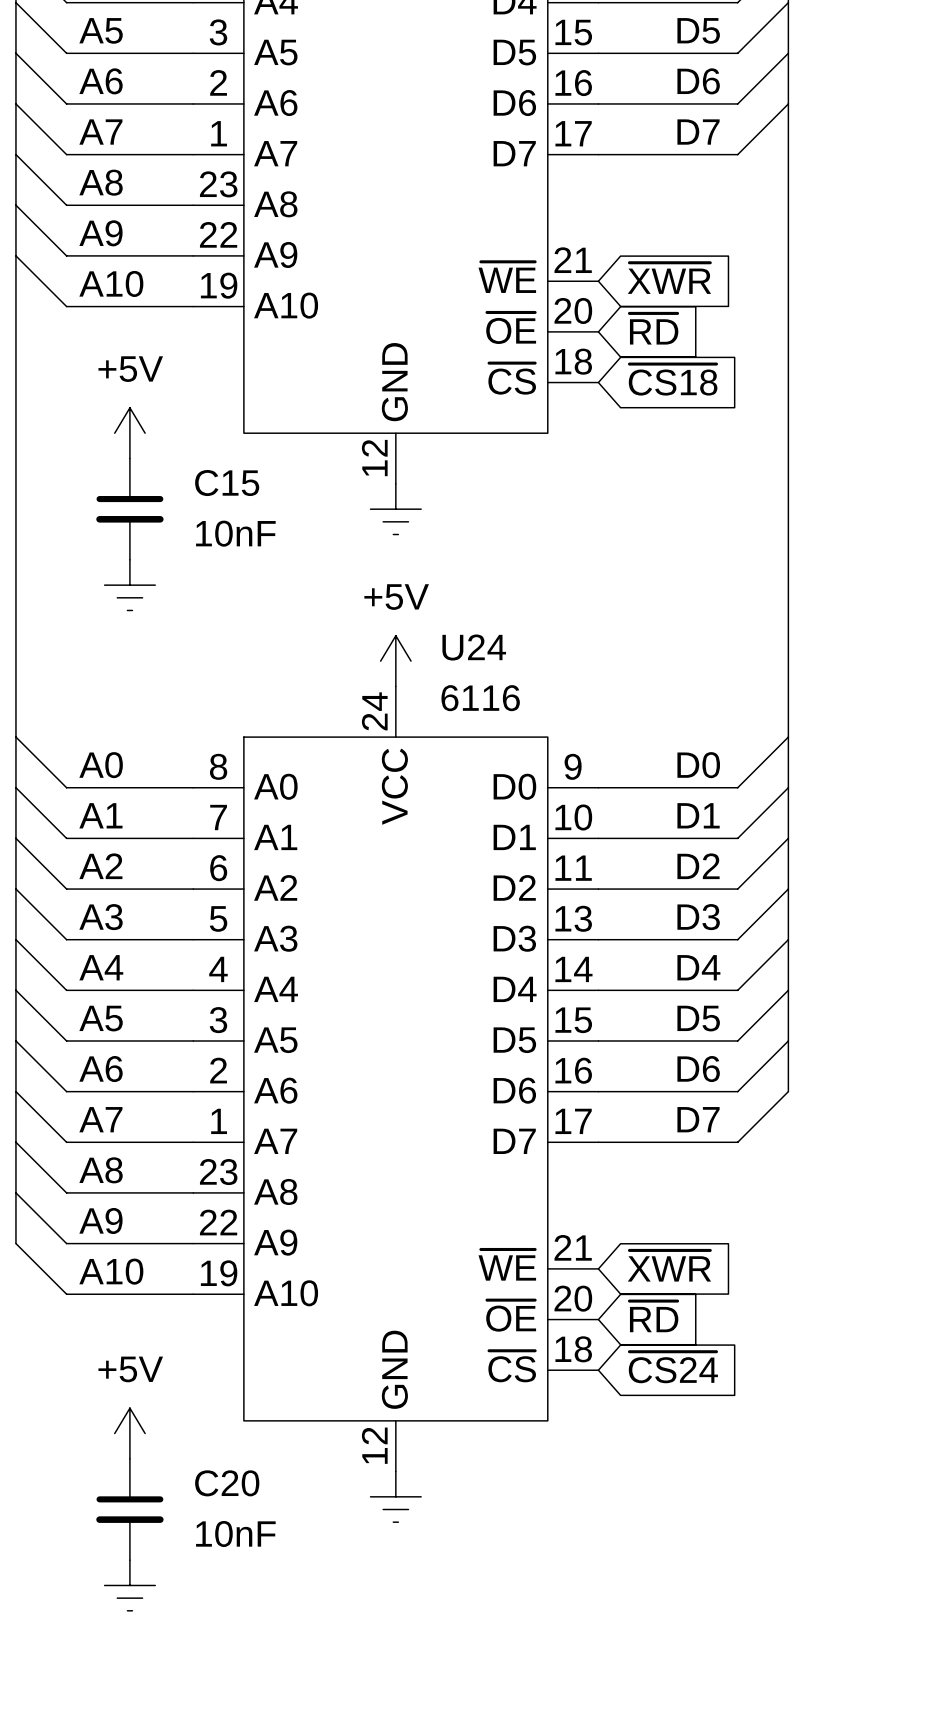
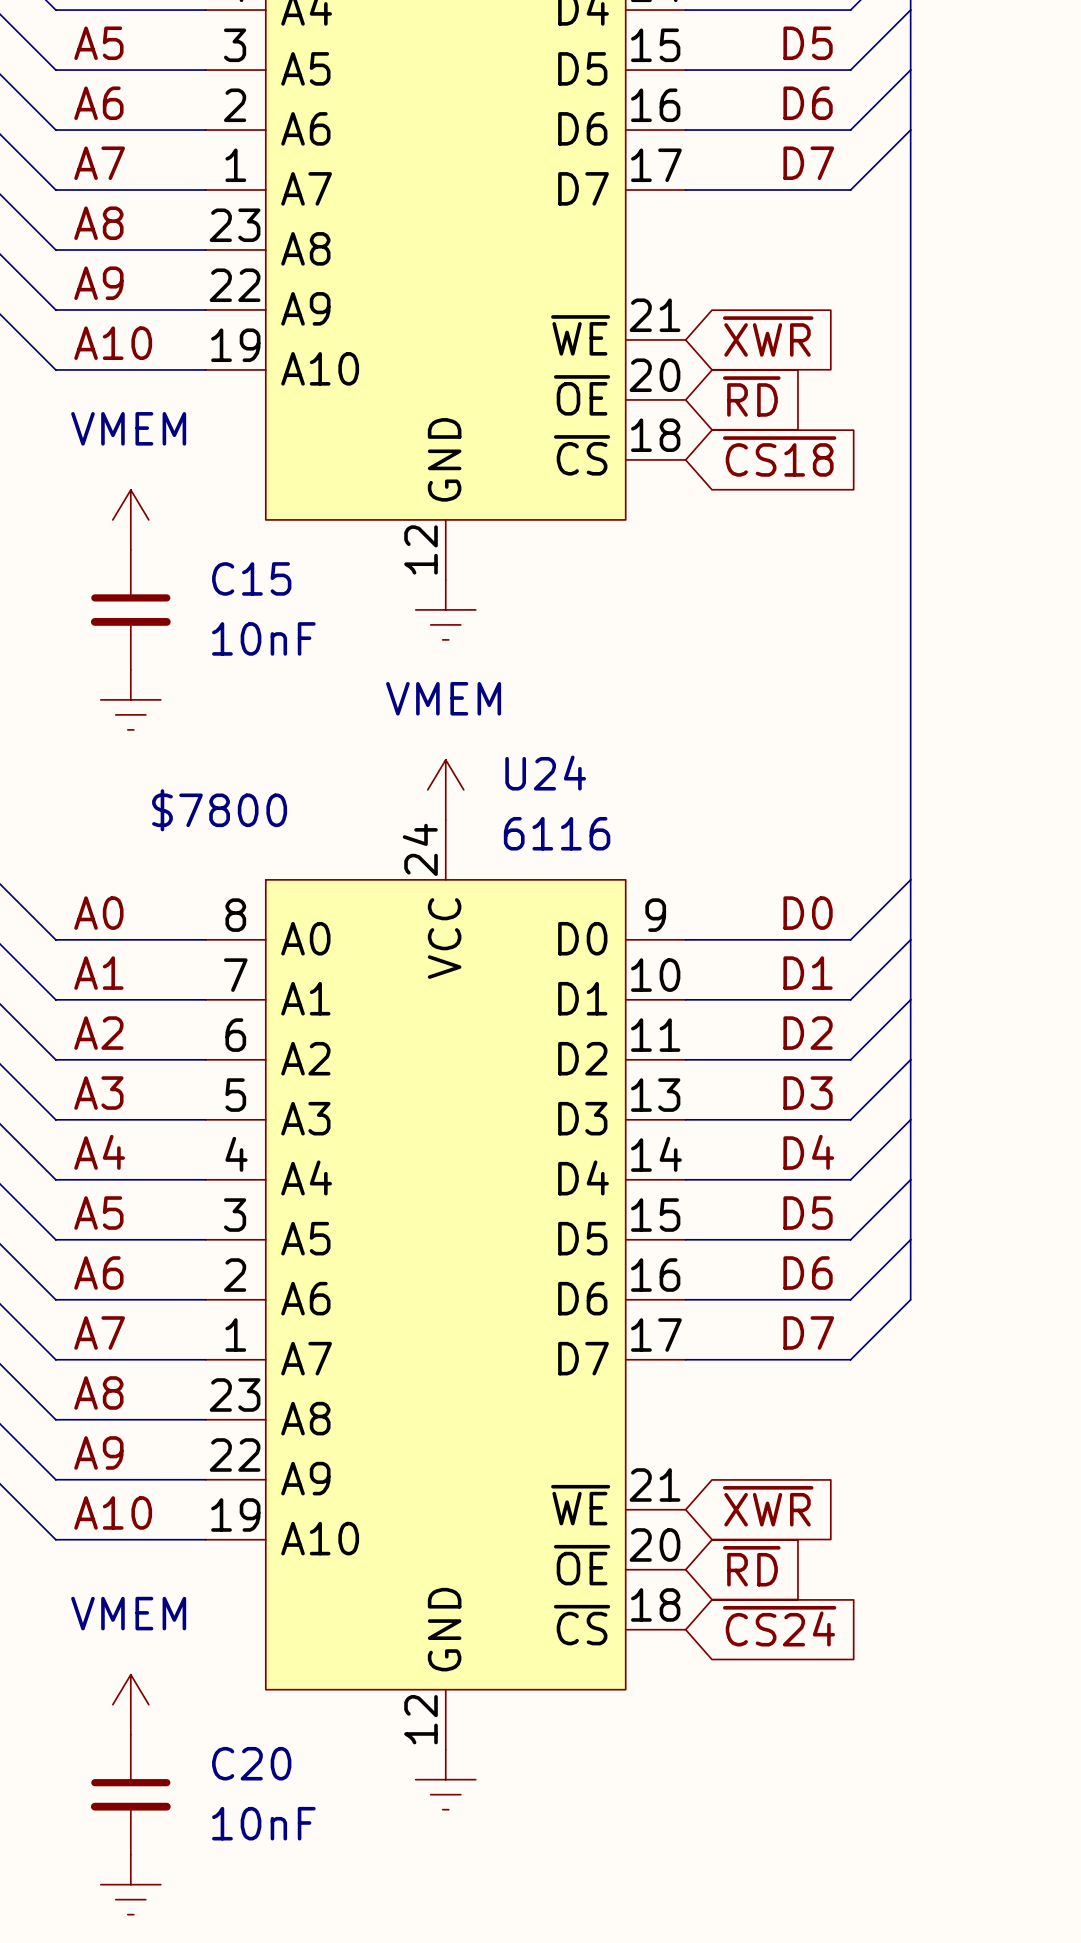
power symbol: +5V (129, 433) -> VMEM (130, 519)
power symbol: +5V (395, 661) -> VMEM (445, 789)
text: none -> $7800 (219, 810)
power symbol: +5V (129, 1433) -> VMEM (130, 1704)

